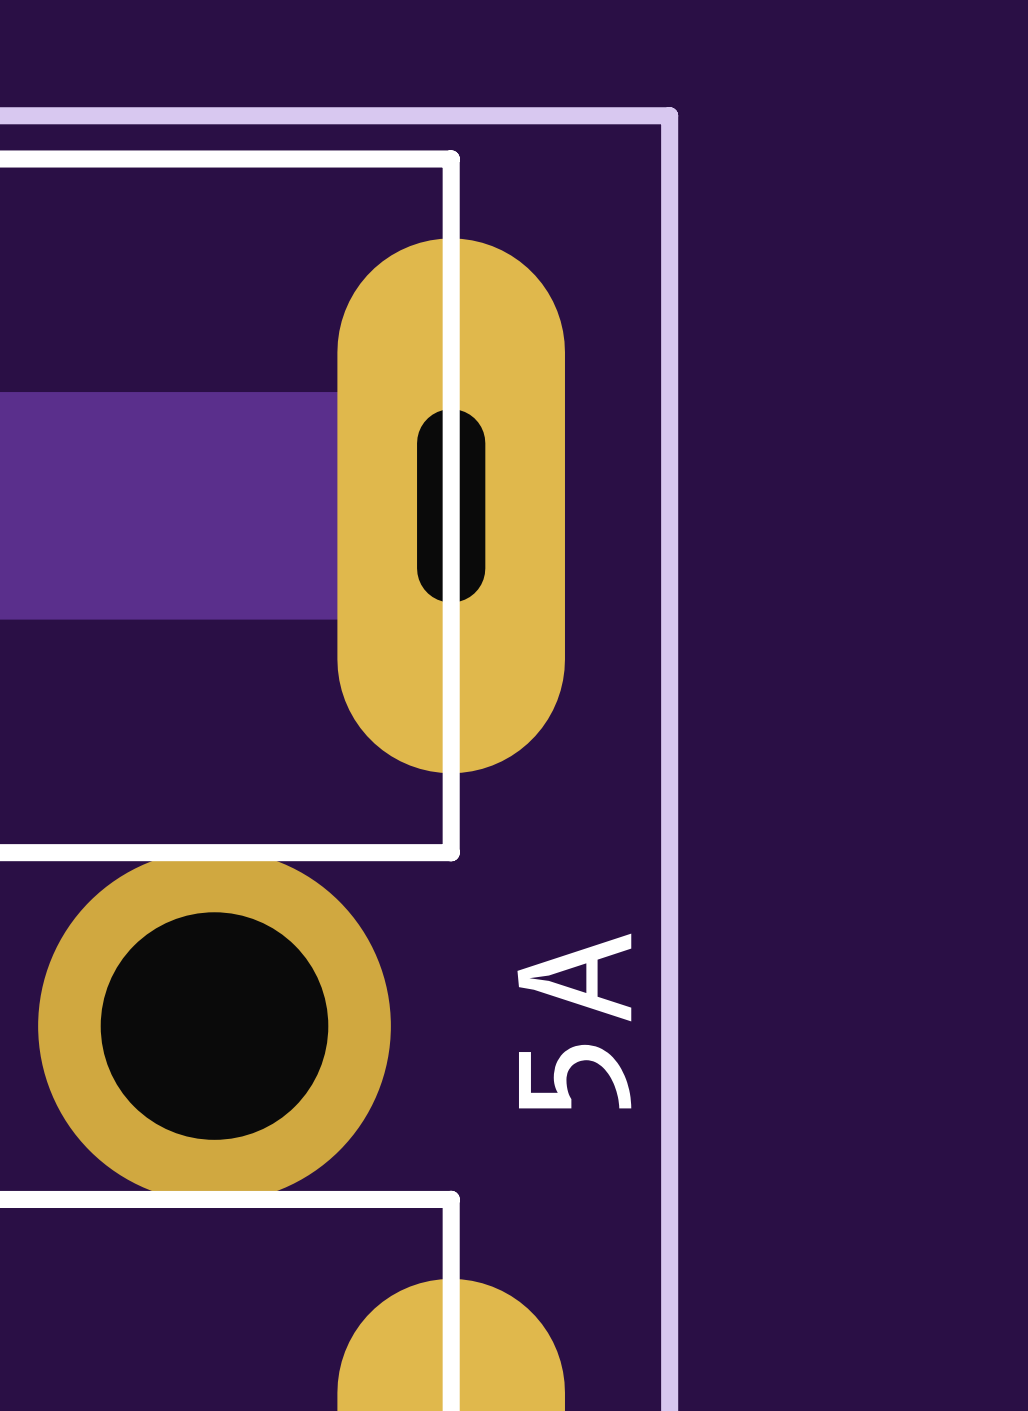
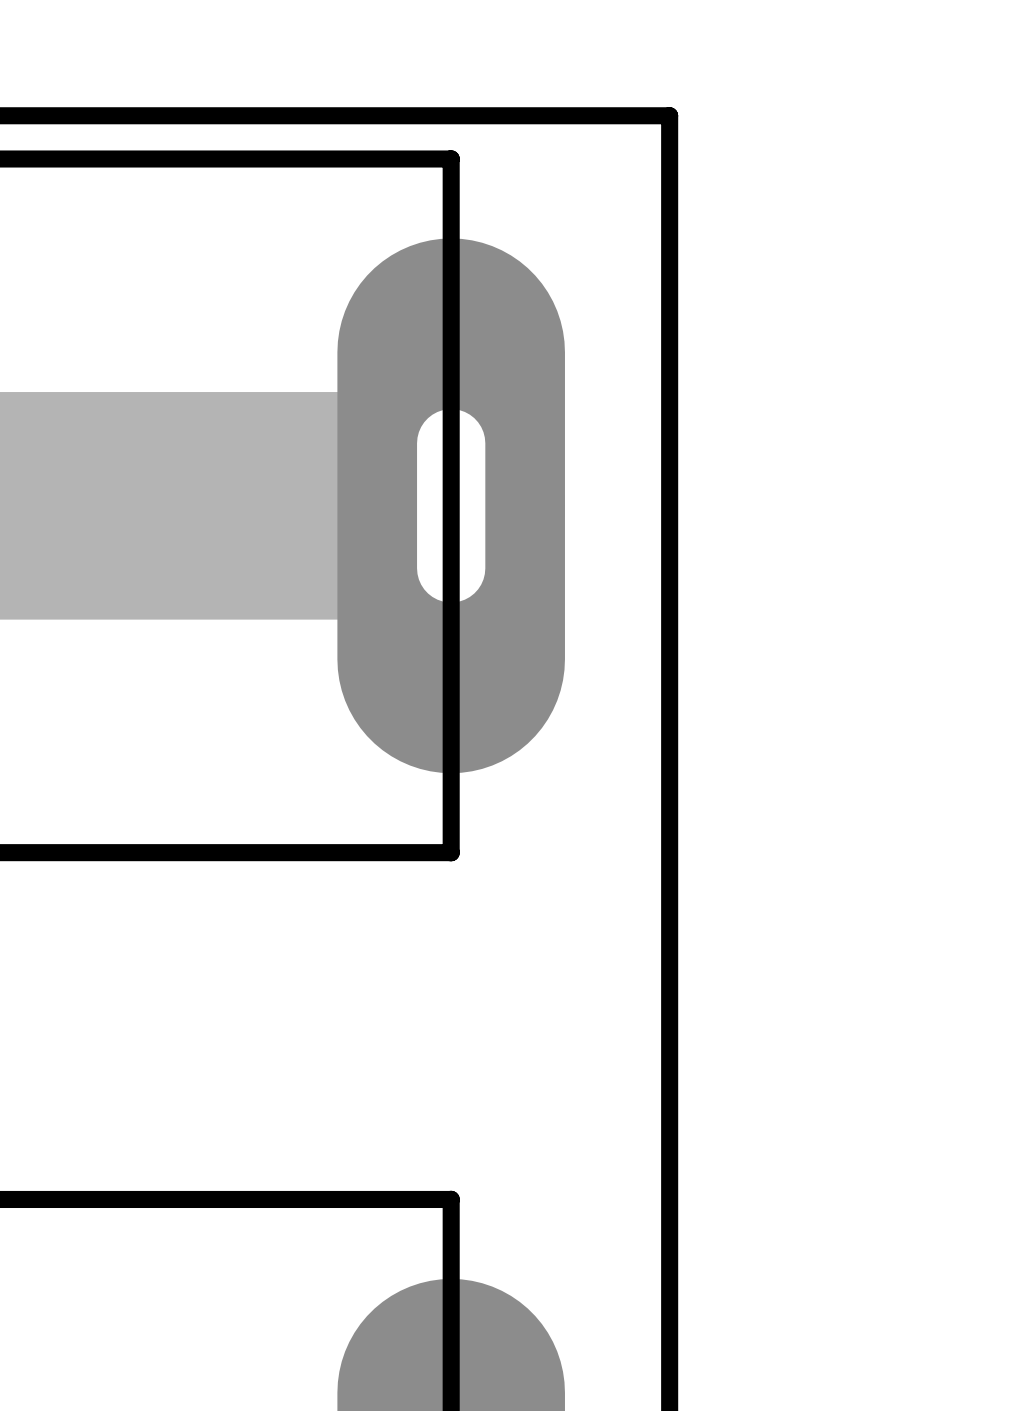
text: 5A (574, 1021) -> none
via: (214, 1026) -> none

